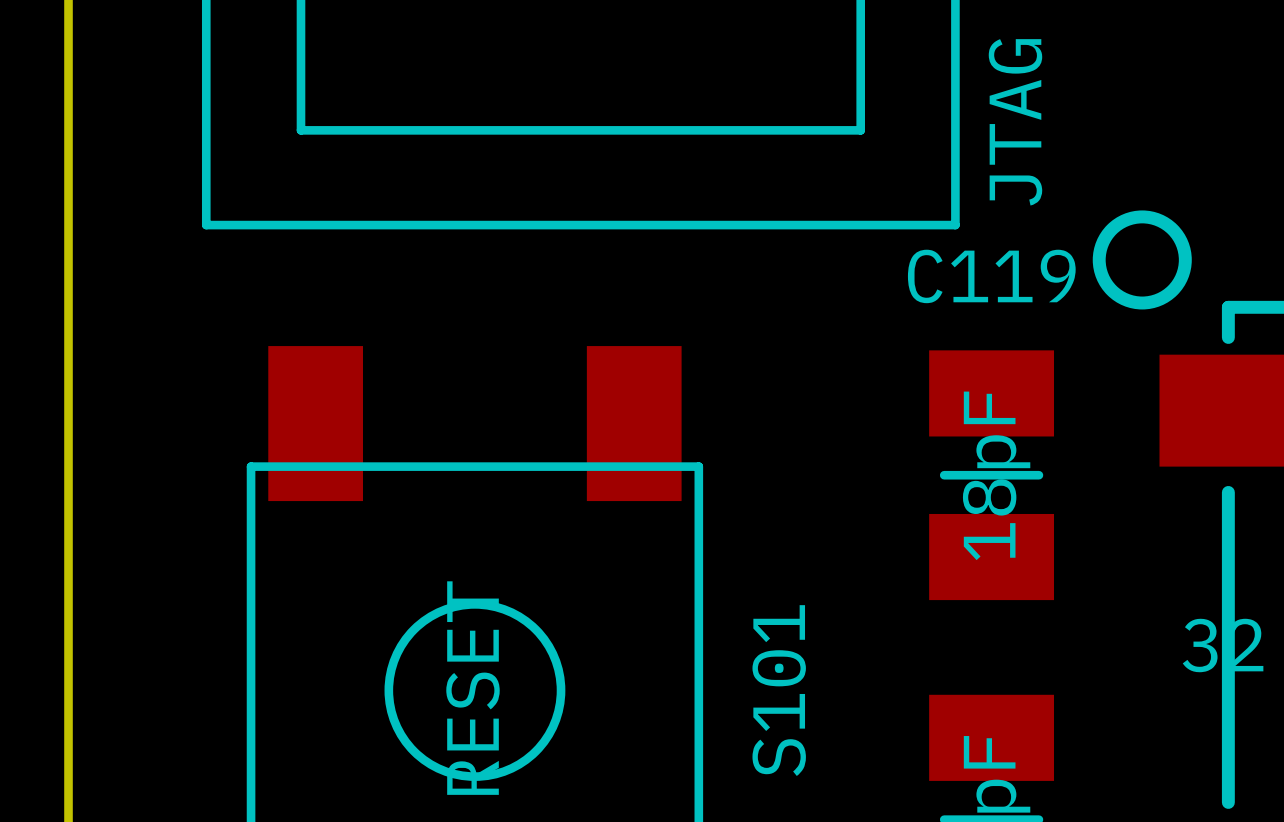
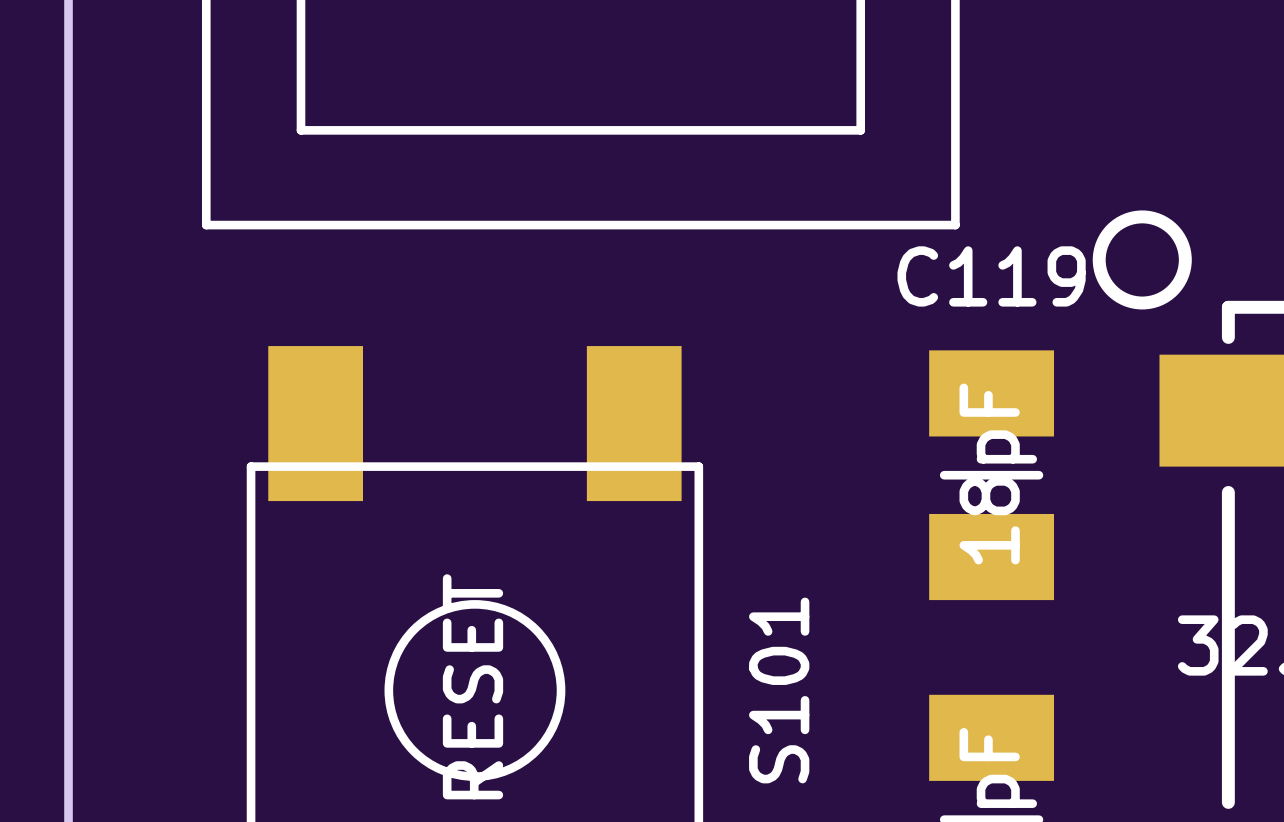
text: JTAG (1015, 122) -> none

